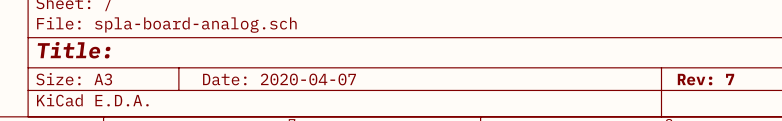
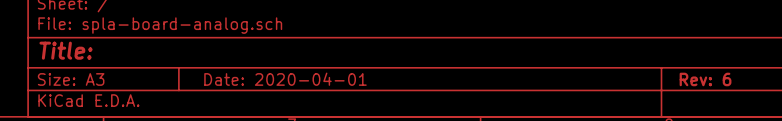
title block: Date: 2020-04-07 (279, 79) -> Date: 2020-04-01 (285, 79)
title block: Rev: 7 (705, 79) -> Rev: 6 (705, 79)

